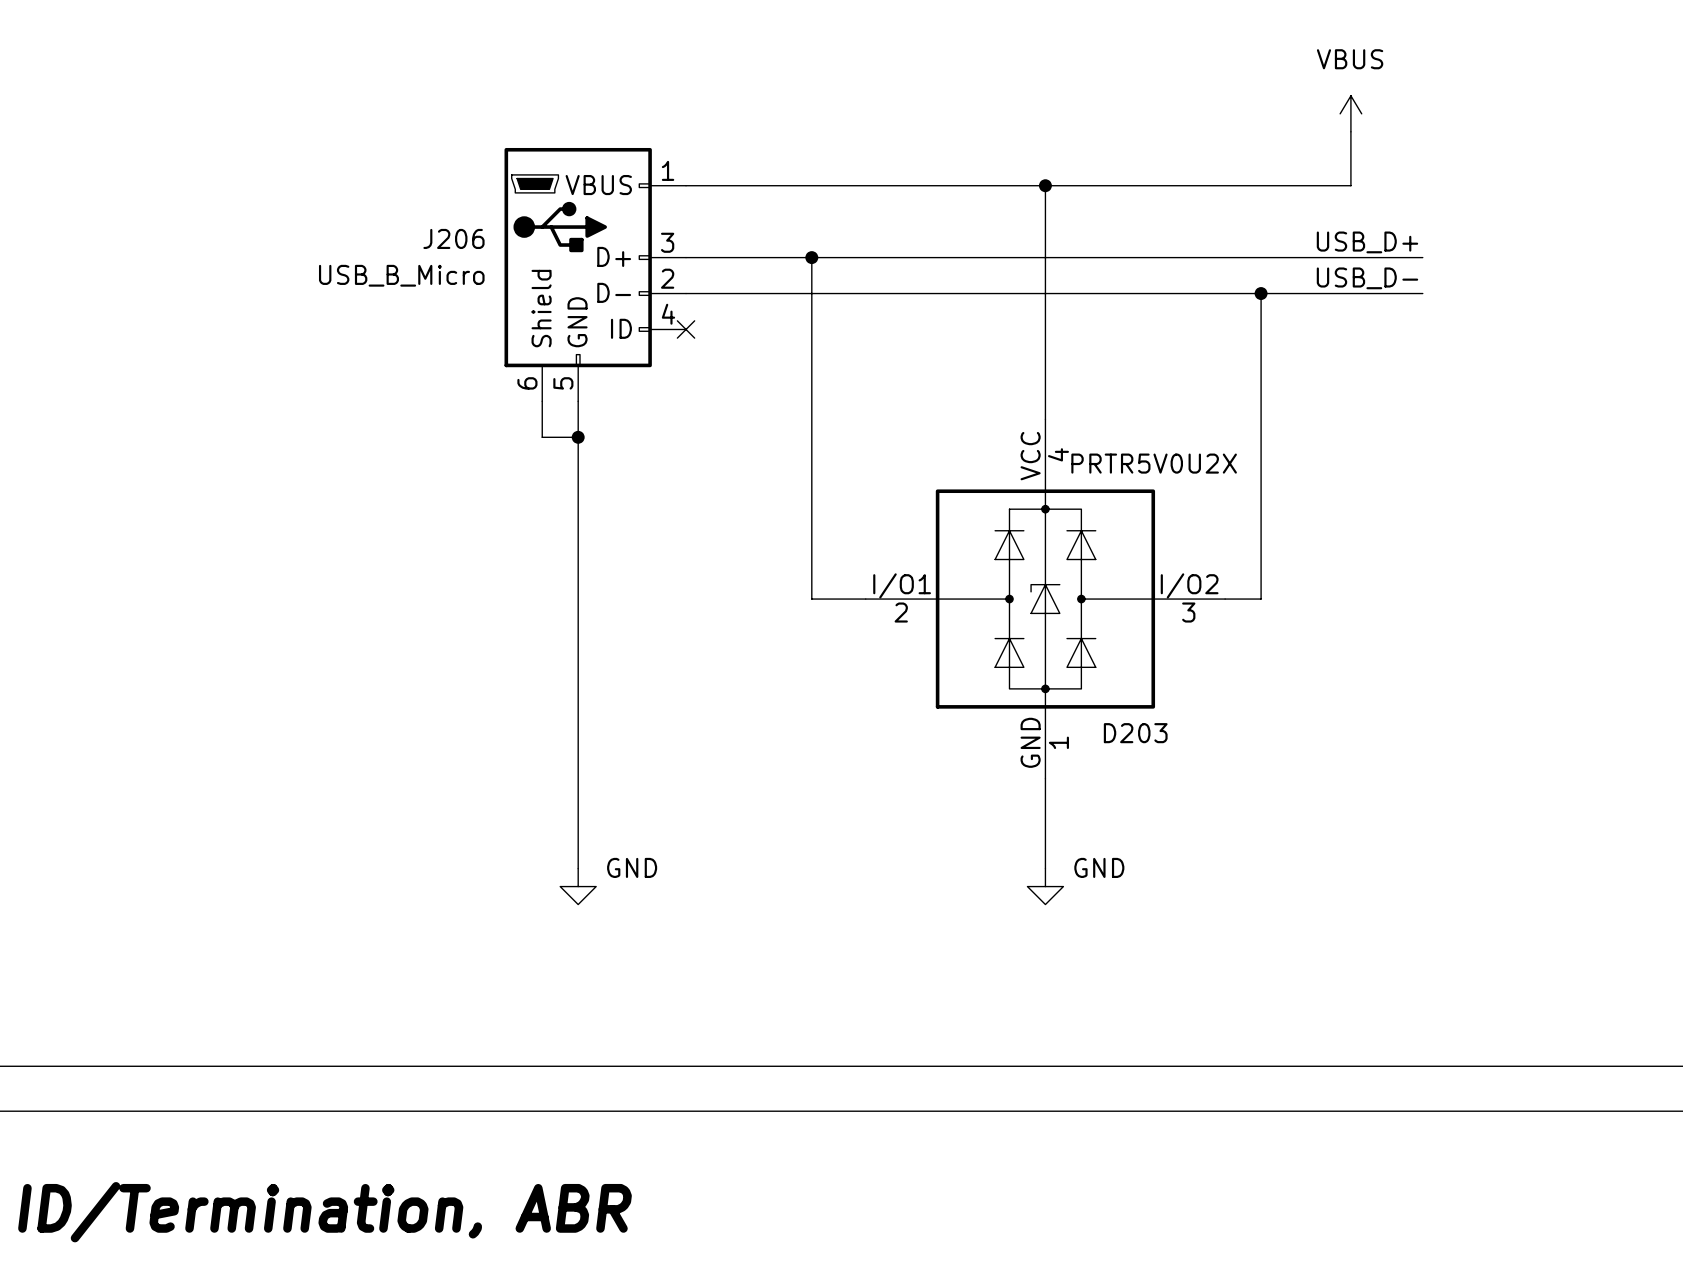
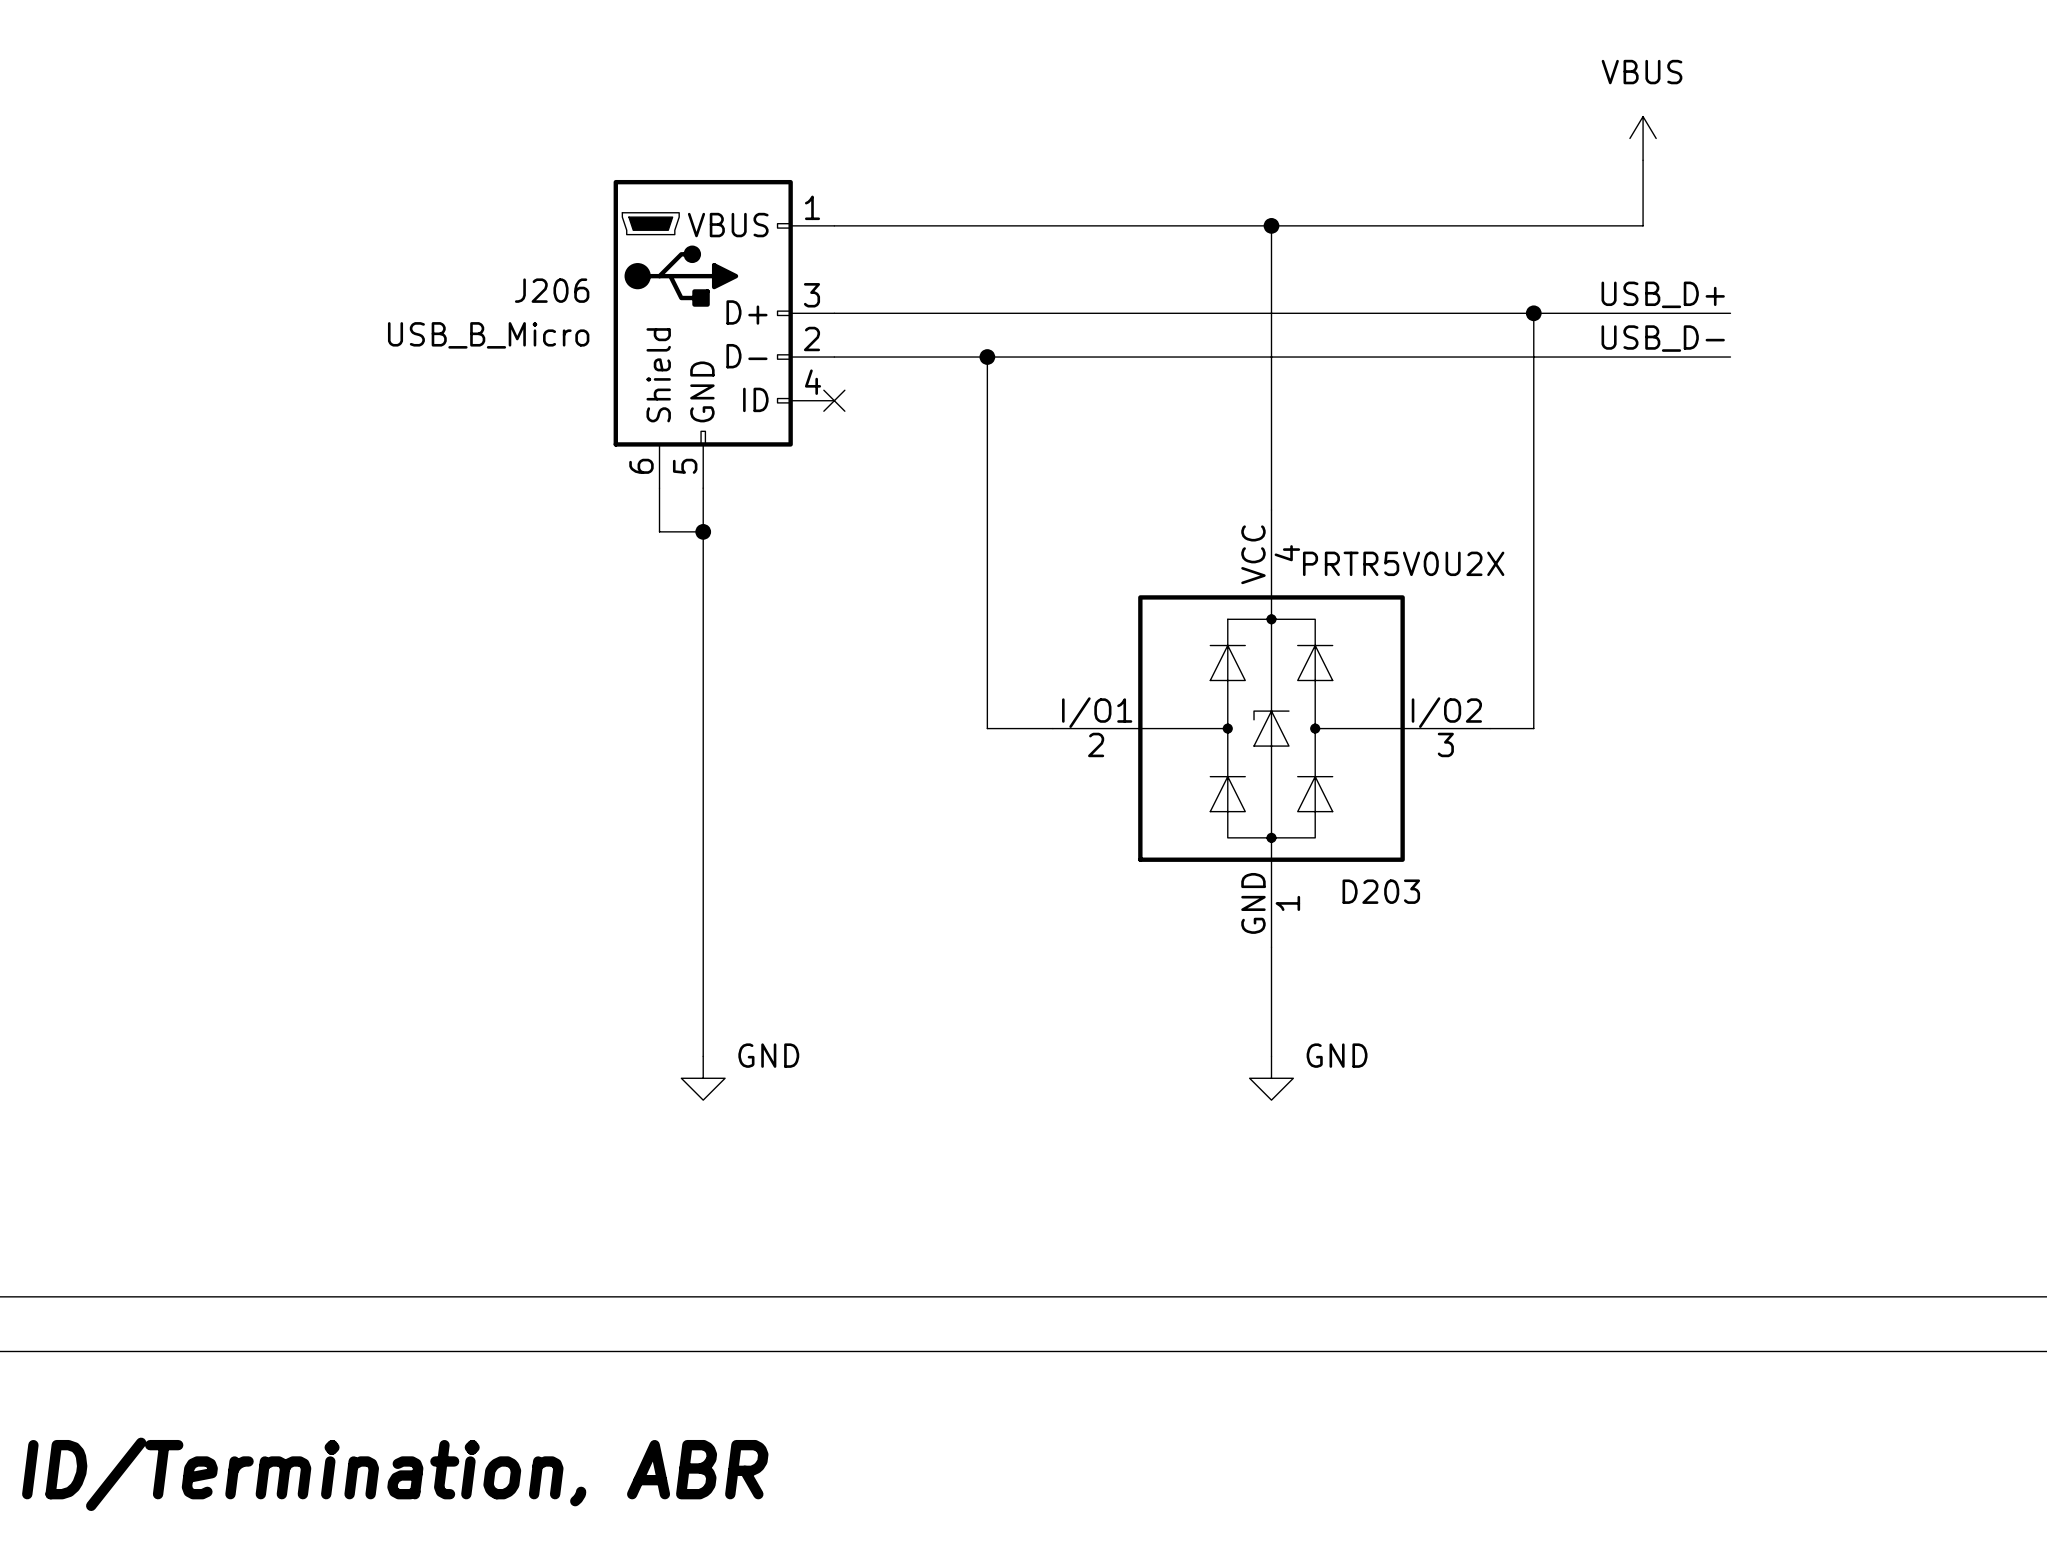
wire: (811, 257) (811, 293) -> none
junction position: (811, 257) -> (987, 357)
wire: none -> (1533, 313) (1533, 357)
junction position: (1261, 293) -> (1533, 313)

